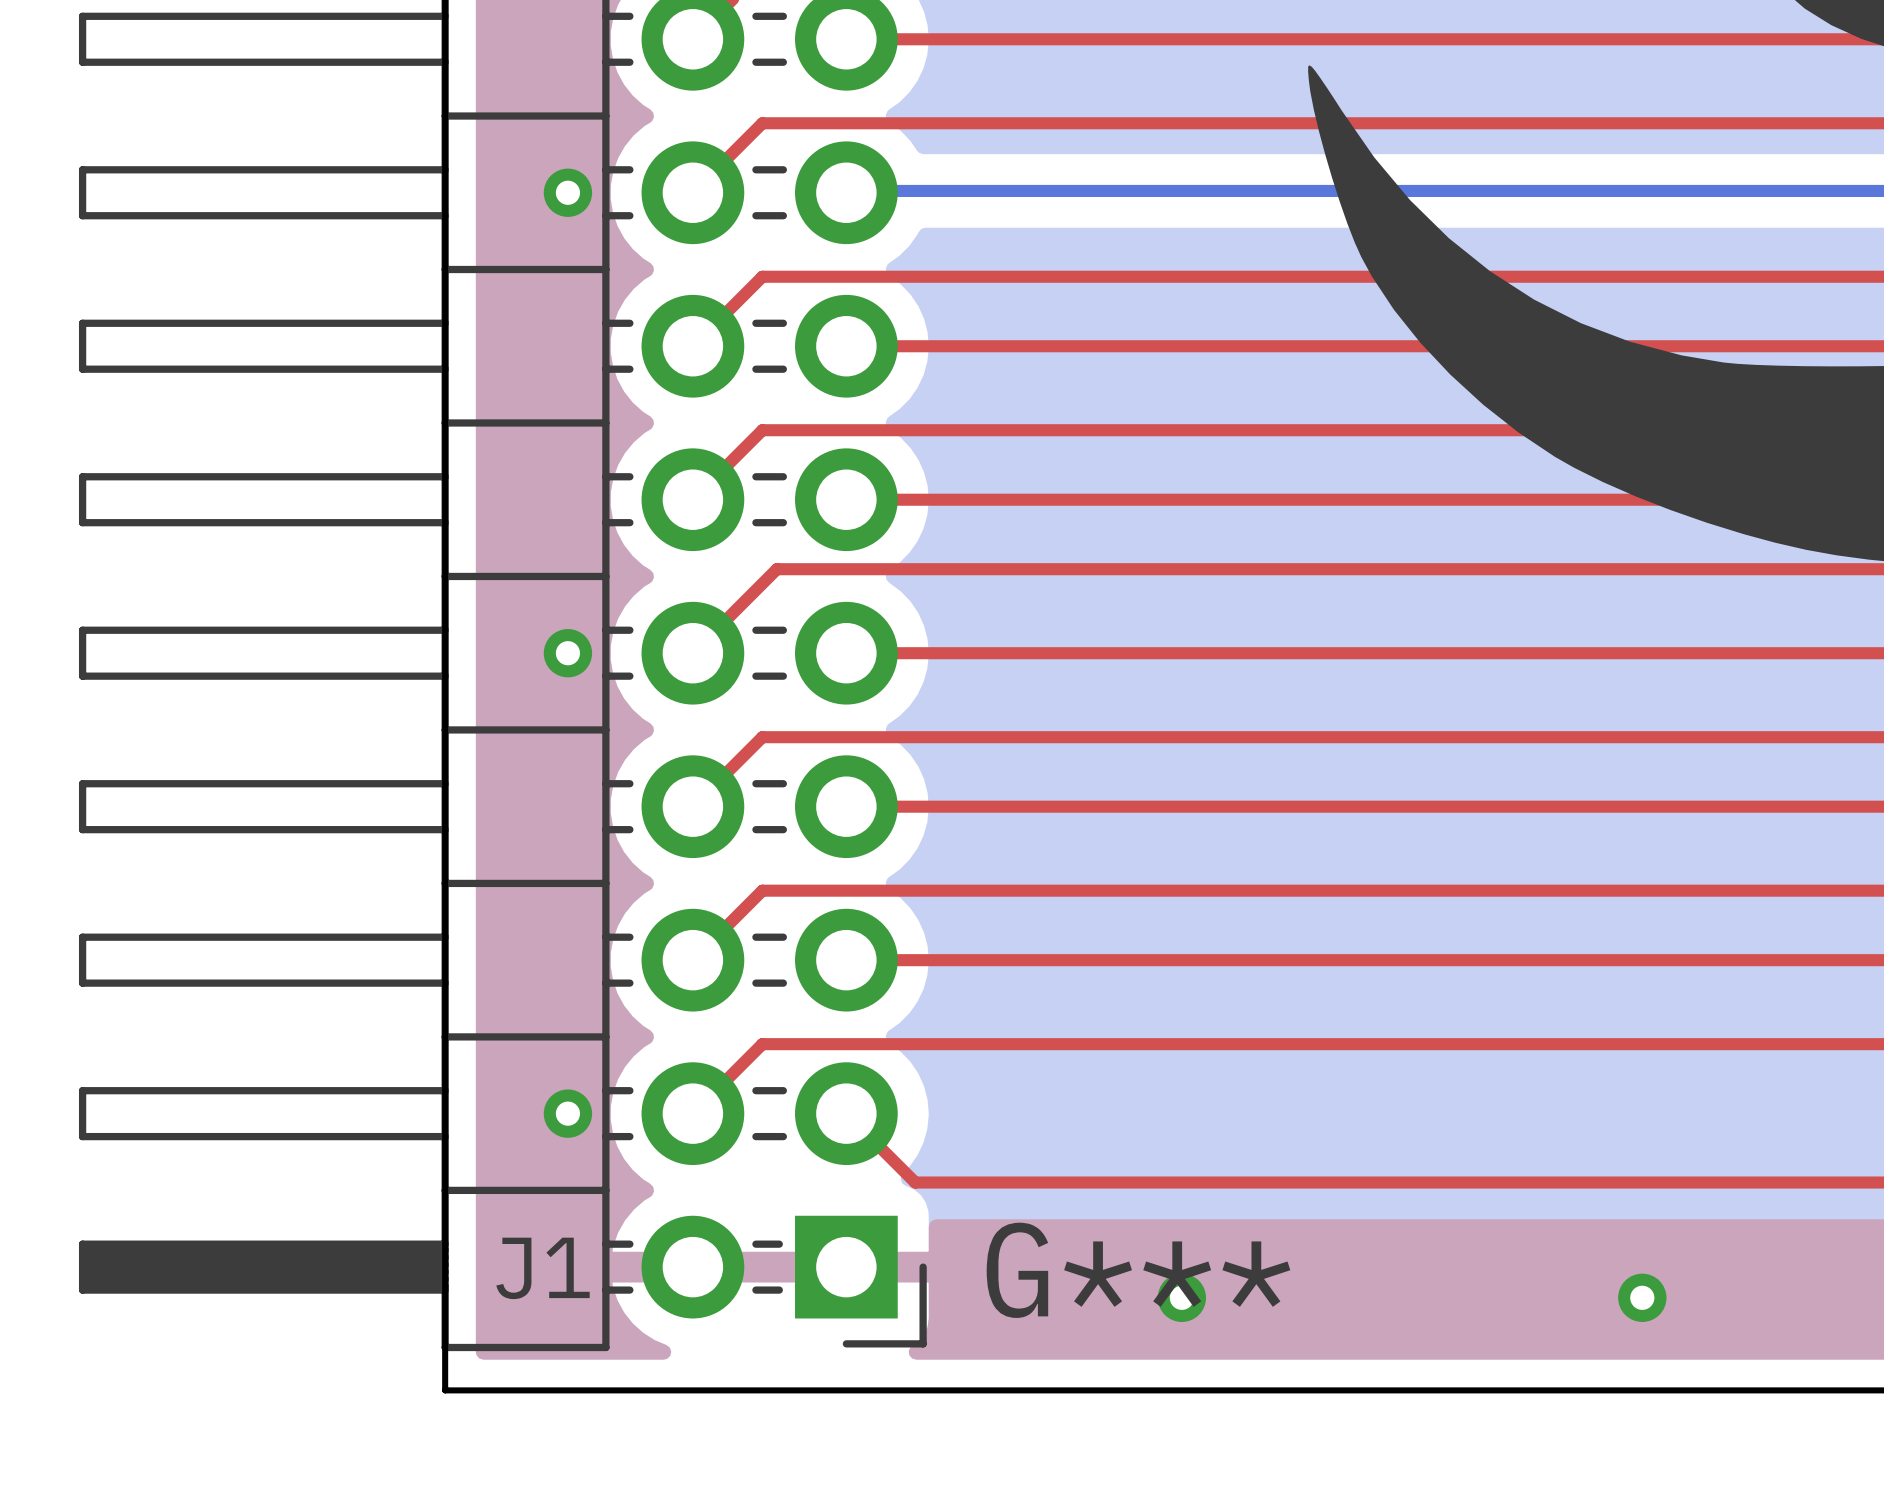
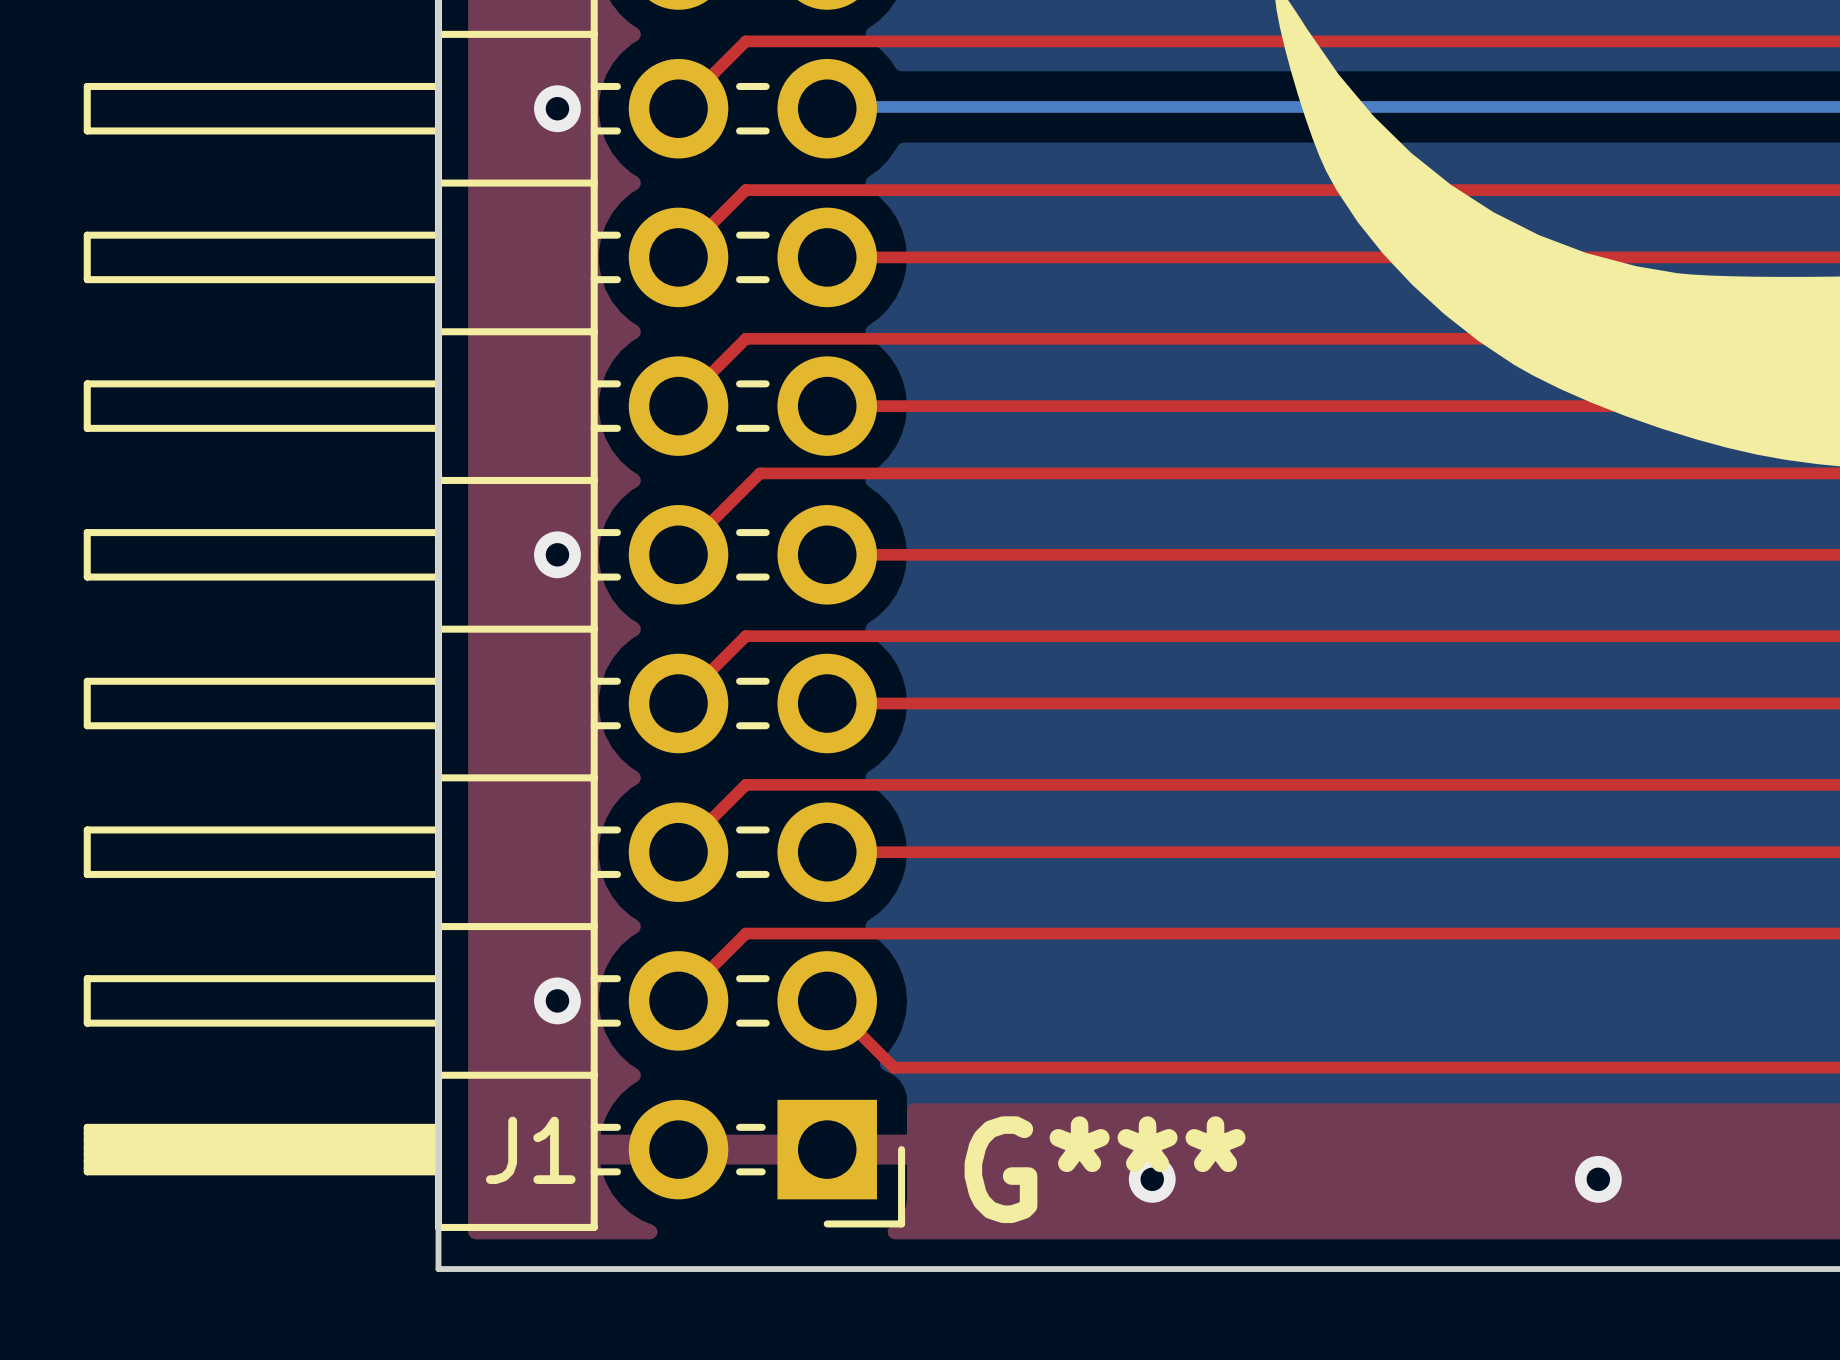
G*** name position: G*** (1138, 1270) -> G*** (1105, 1169)

